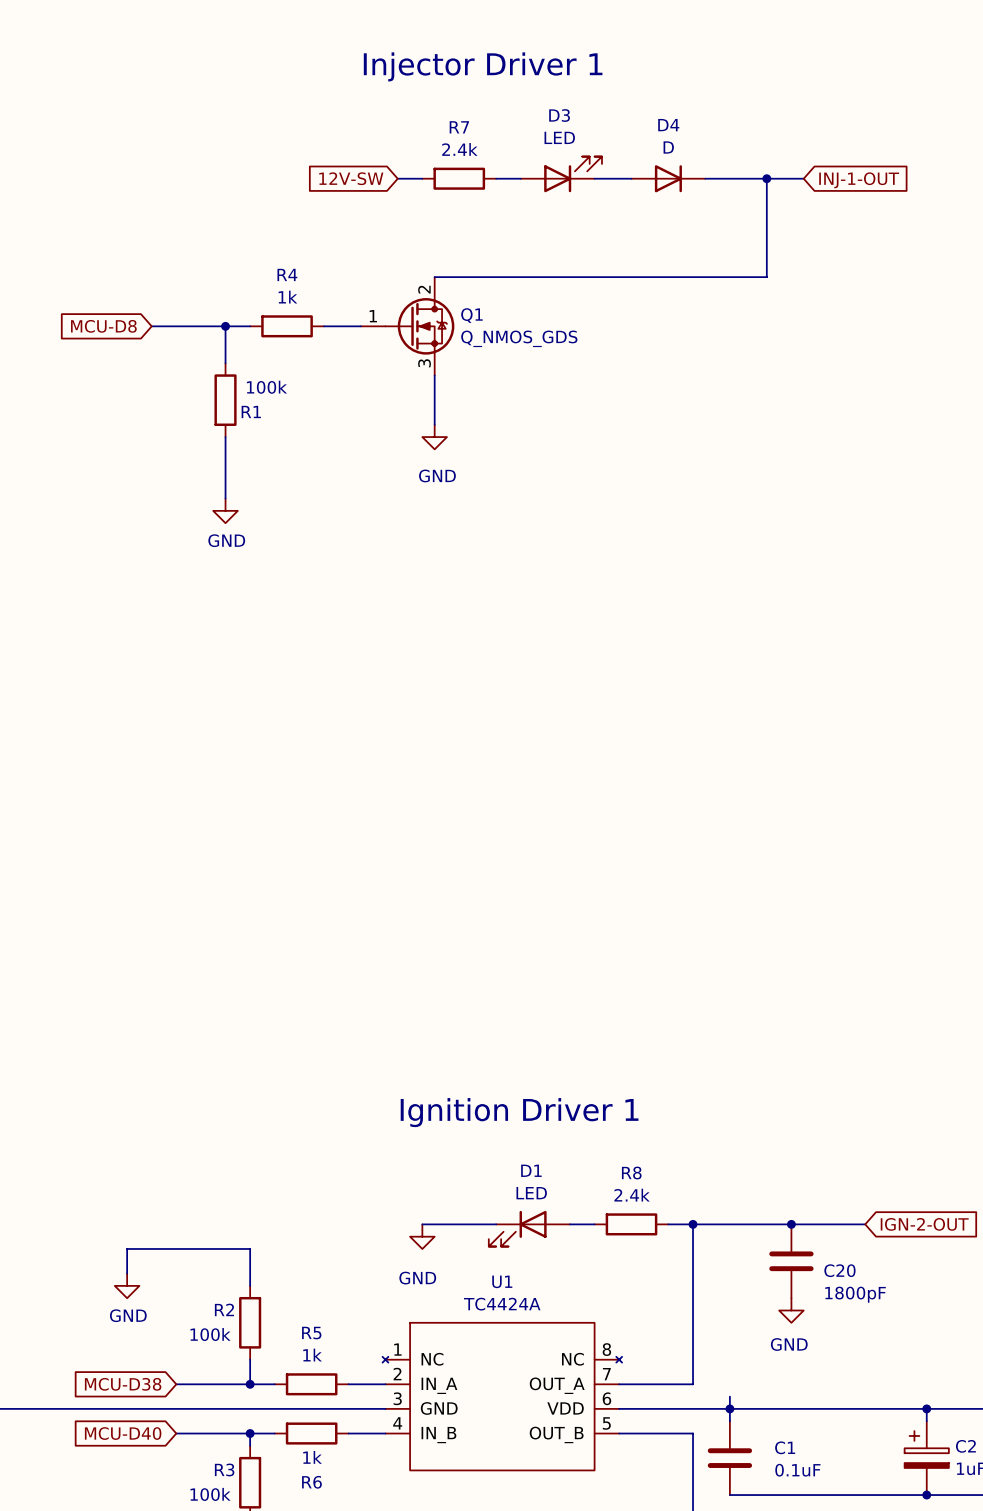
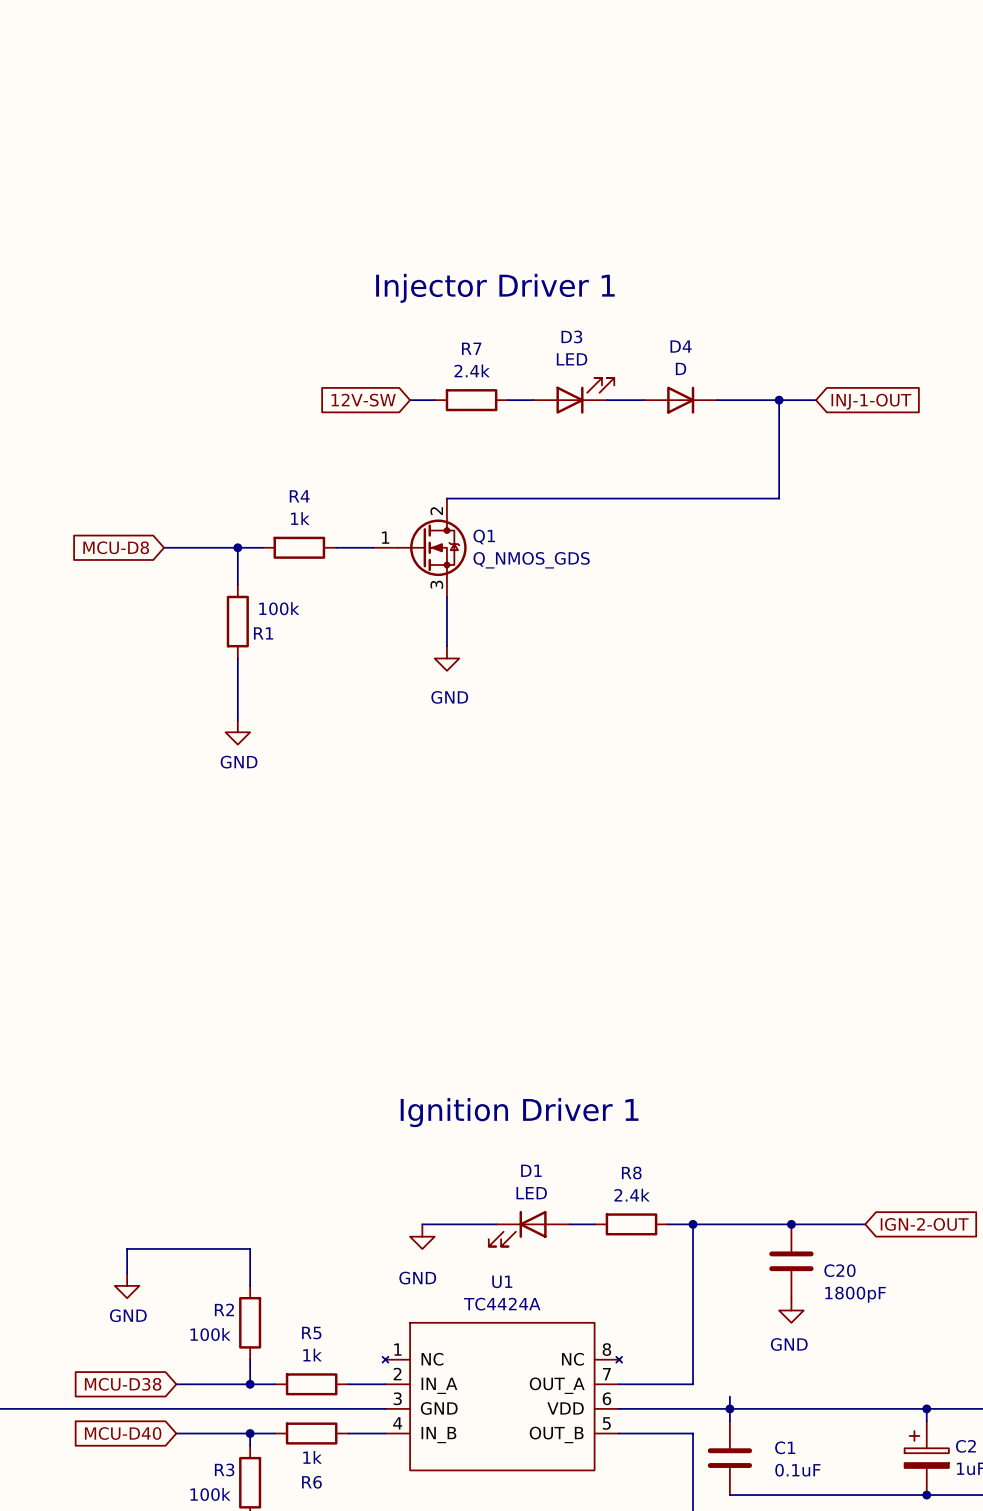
text position: Injector Driver 1 (483, 66) -> Injector Driver 1 (495, 288)
D3 position: (561, 174) -> (573, 395)
global label position: 12V-SW (351, 178) -> 12V-SW (363, 400)
wire: (397, 178) (422, 178) -> (410, 400) (434, 400)
R7 position: (459, 178) -> (471, 400)
wire: (496, 178) (520, 178) -> (508, 400) (533, 400)
wire: (594, 178) (631, 178) -> (606, 400) (643, 400)
D4 position: (668, 178) -> (680, 400)
wire: (705, 178) (803, 178) -> (717, 400) (816, 400)
wire: (766, 178) (766, 277) (434, 277) -> (779, 400) (779, 498) (446, 498)
junction: (766, 178) -> none
global label position: INJ-1-OUT (859, 180) -> INJ-1-OUT (871, 401)
global label position: MCU-D8 (103, 326) -> MCU-D8 (116, 547)
wire: (151, 326) (250, 326) -> (164, 547) (262, 547)
wire: (225, 326) (225, 363) -> (237, 547) (237, 584)
junction: (225, 326) -> none
R4 position: (287, 326) -> (299, 547)
wire: (323, 326) (360, 326) -> (336, 547) (373, 547)
Q1 position: (407, 326) -> (419, 547)
wire: (434, 375) (434, 424) -> (446, 596) (446, 646)
R1 position: (225, 400) -> (237, 621)
junction: none -> (779, 400)
wire: (225, 437) (225, 498) -> (237, 658) (237, 720)
power symbol: GND (434, 437) -> none
power symbol: GND (225, 510) -> none
junction: none -> (237, 547)
power symbol: none -> GND (446, 658)
power symbol: none -> GND (237, 732)

